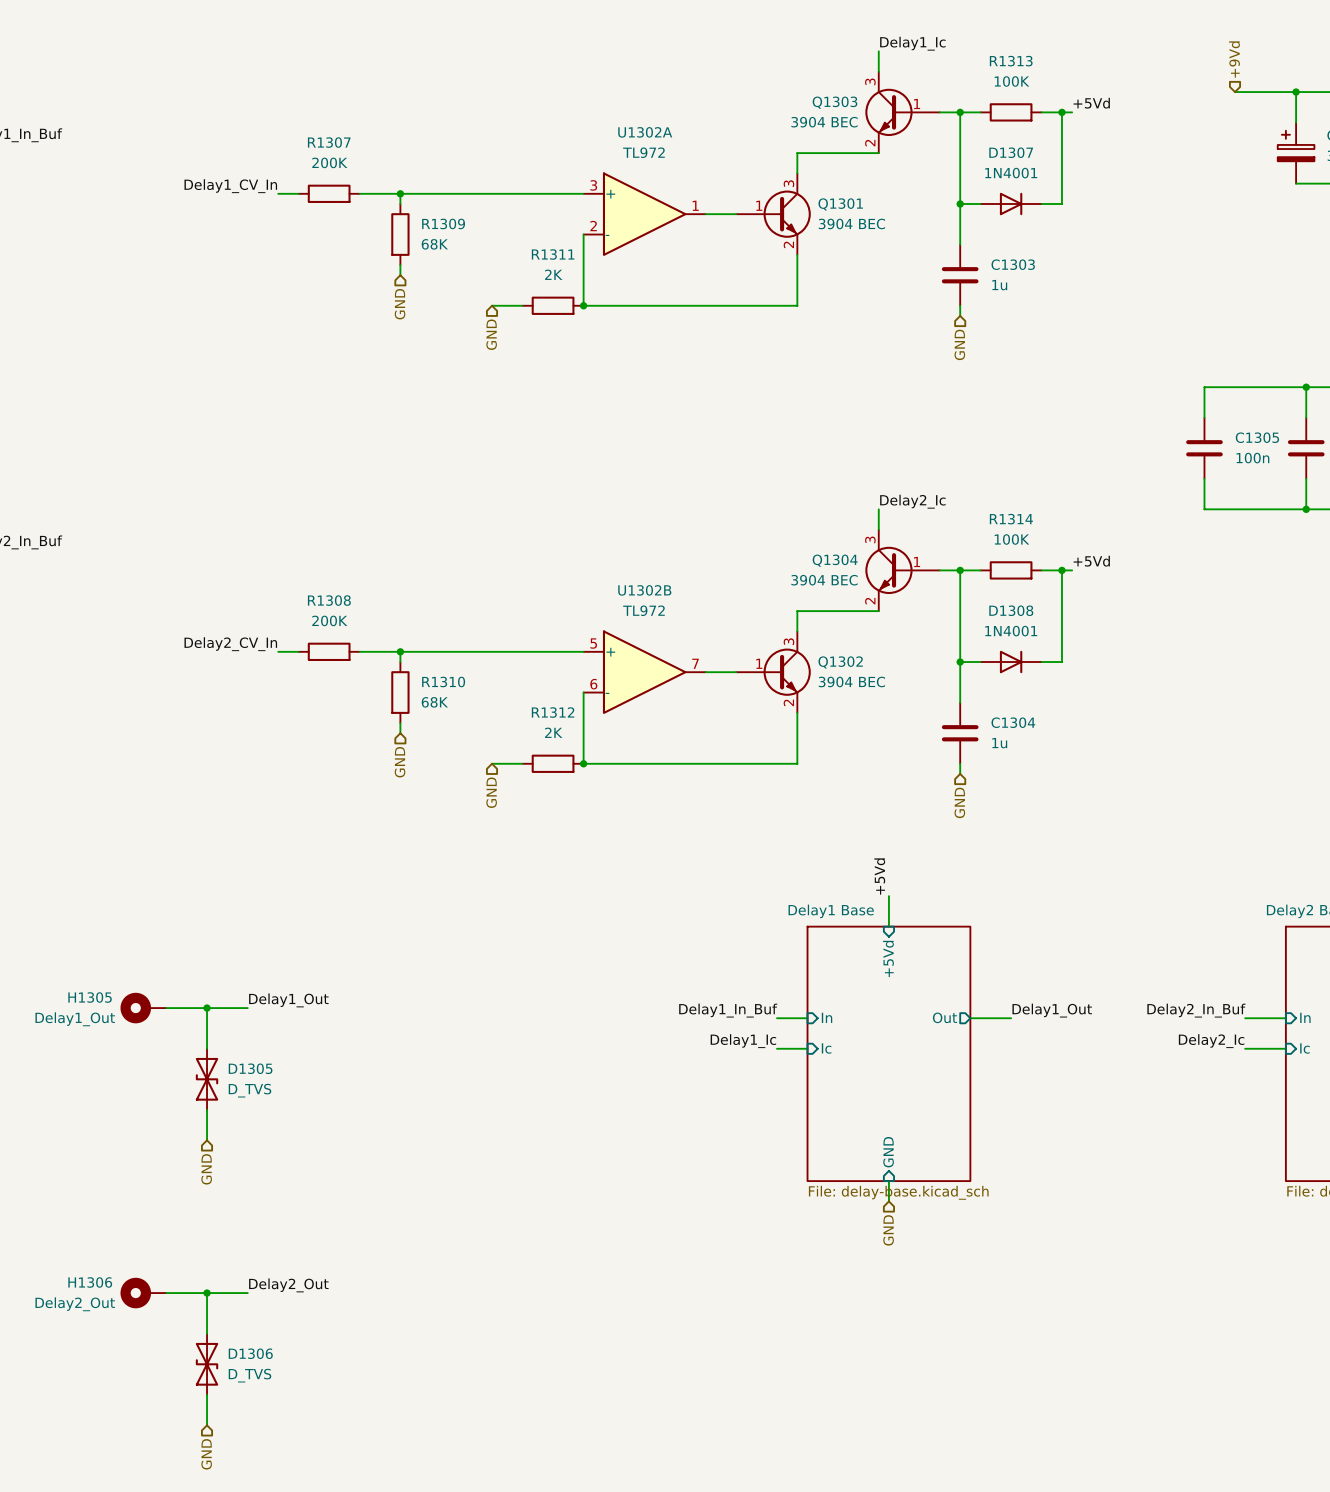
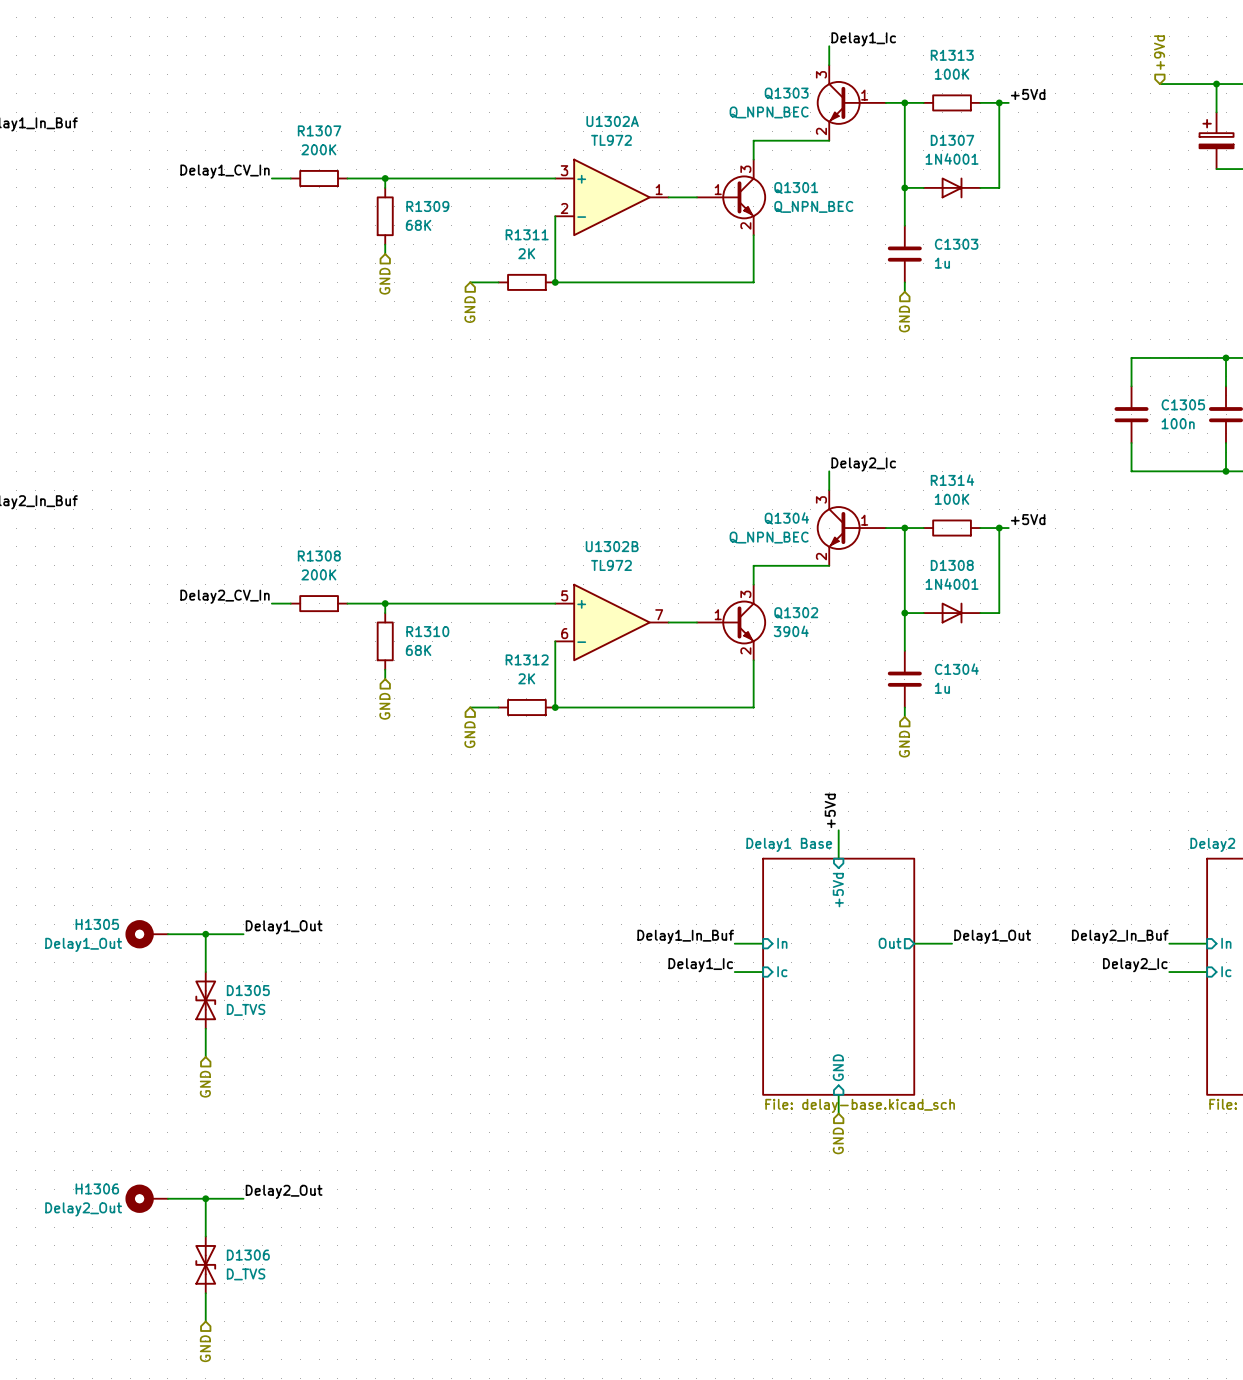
Q1303 value: 3904 BEC (824, 122) -> Q_NPN_BEC (769, 112)
Q1301 value: 3904 BEC (851, 223) -> Q_NPN_BEC (813, 206)
Q1304 value: 3904 BEC (824, 580) -> Q_NPN_BEC (769, 537)
Q1302 value: 3904 BEC (851, 681) -> 3904 (791, 631)

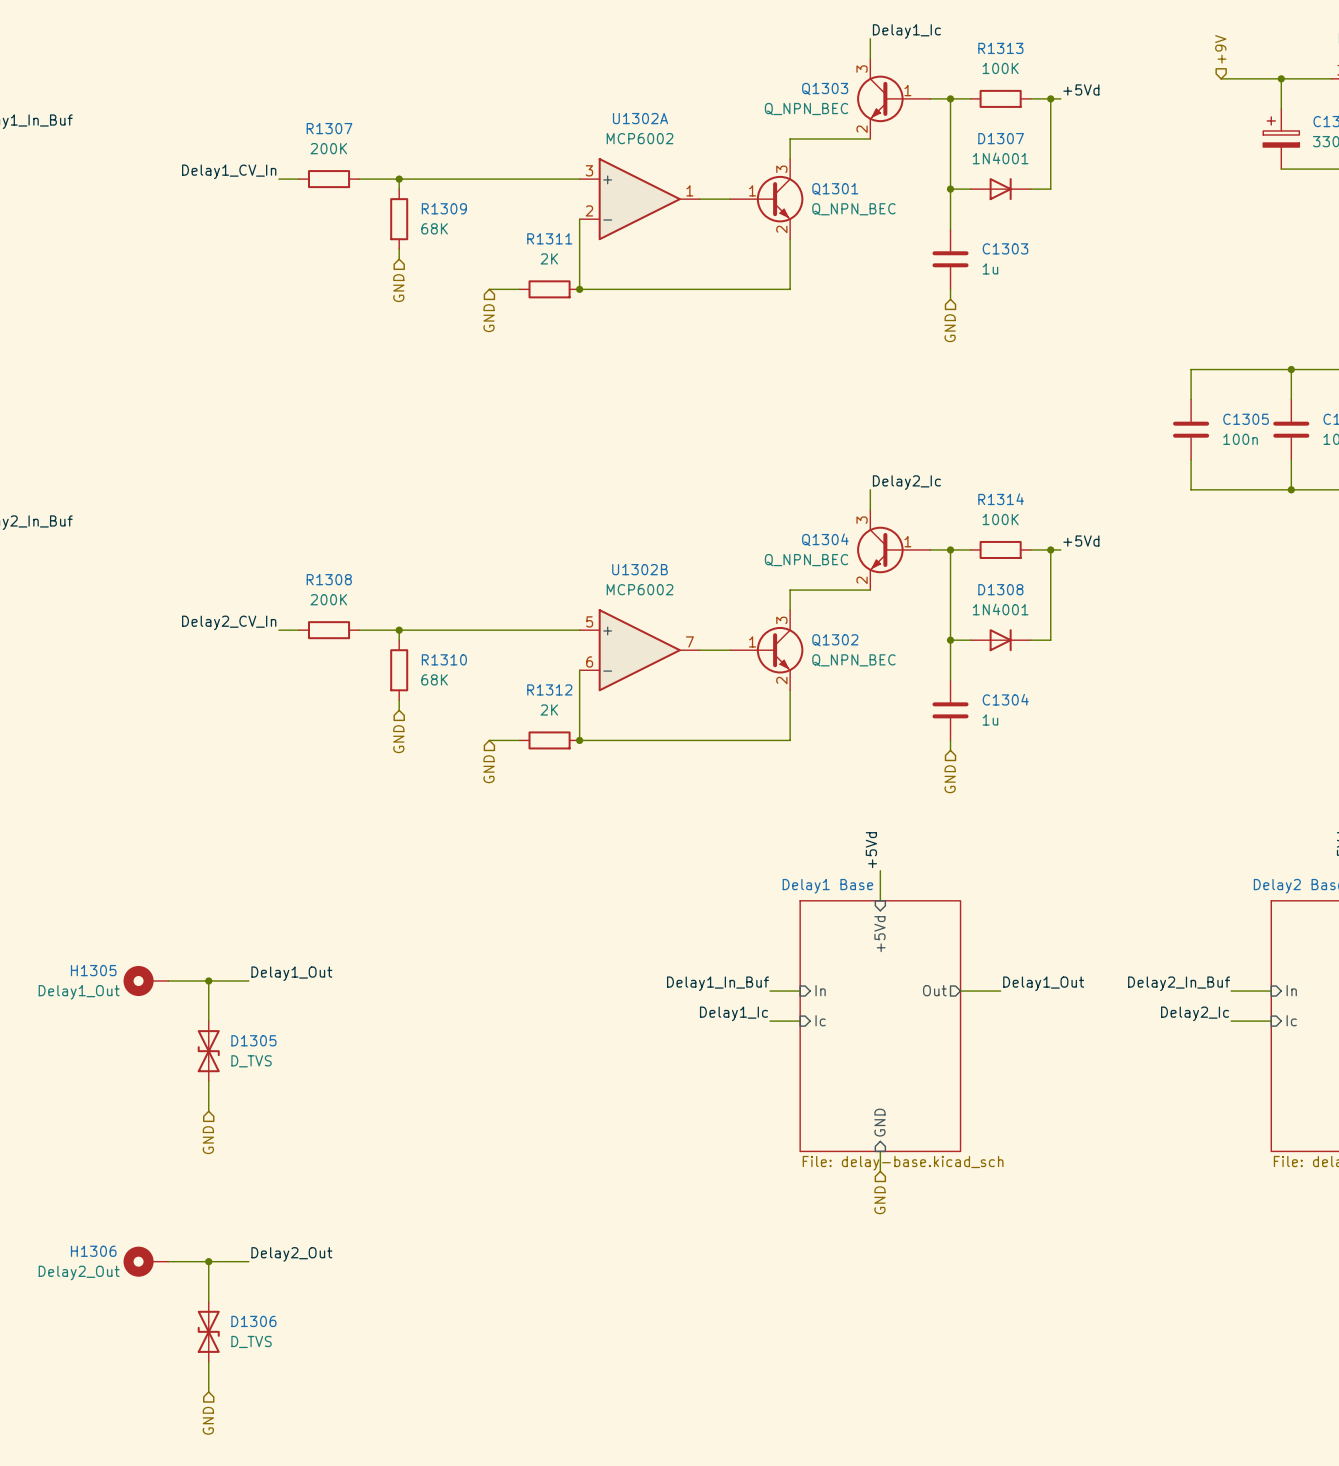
hierarchical label: +9Vd (1159, 52) -> +9V (1220, 49)
U1302A value: TL972 (611, 140) -> MCP6002 (640, 138)
U1302B value: TL972 (611, 565) -> MCP6002 (640, 589)
Q1302 value: 3904 (791, 631) -> Q_NPN_BEC (853, 660)

